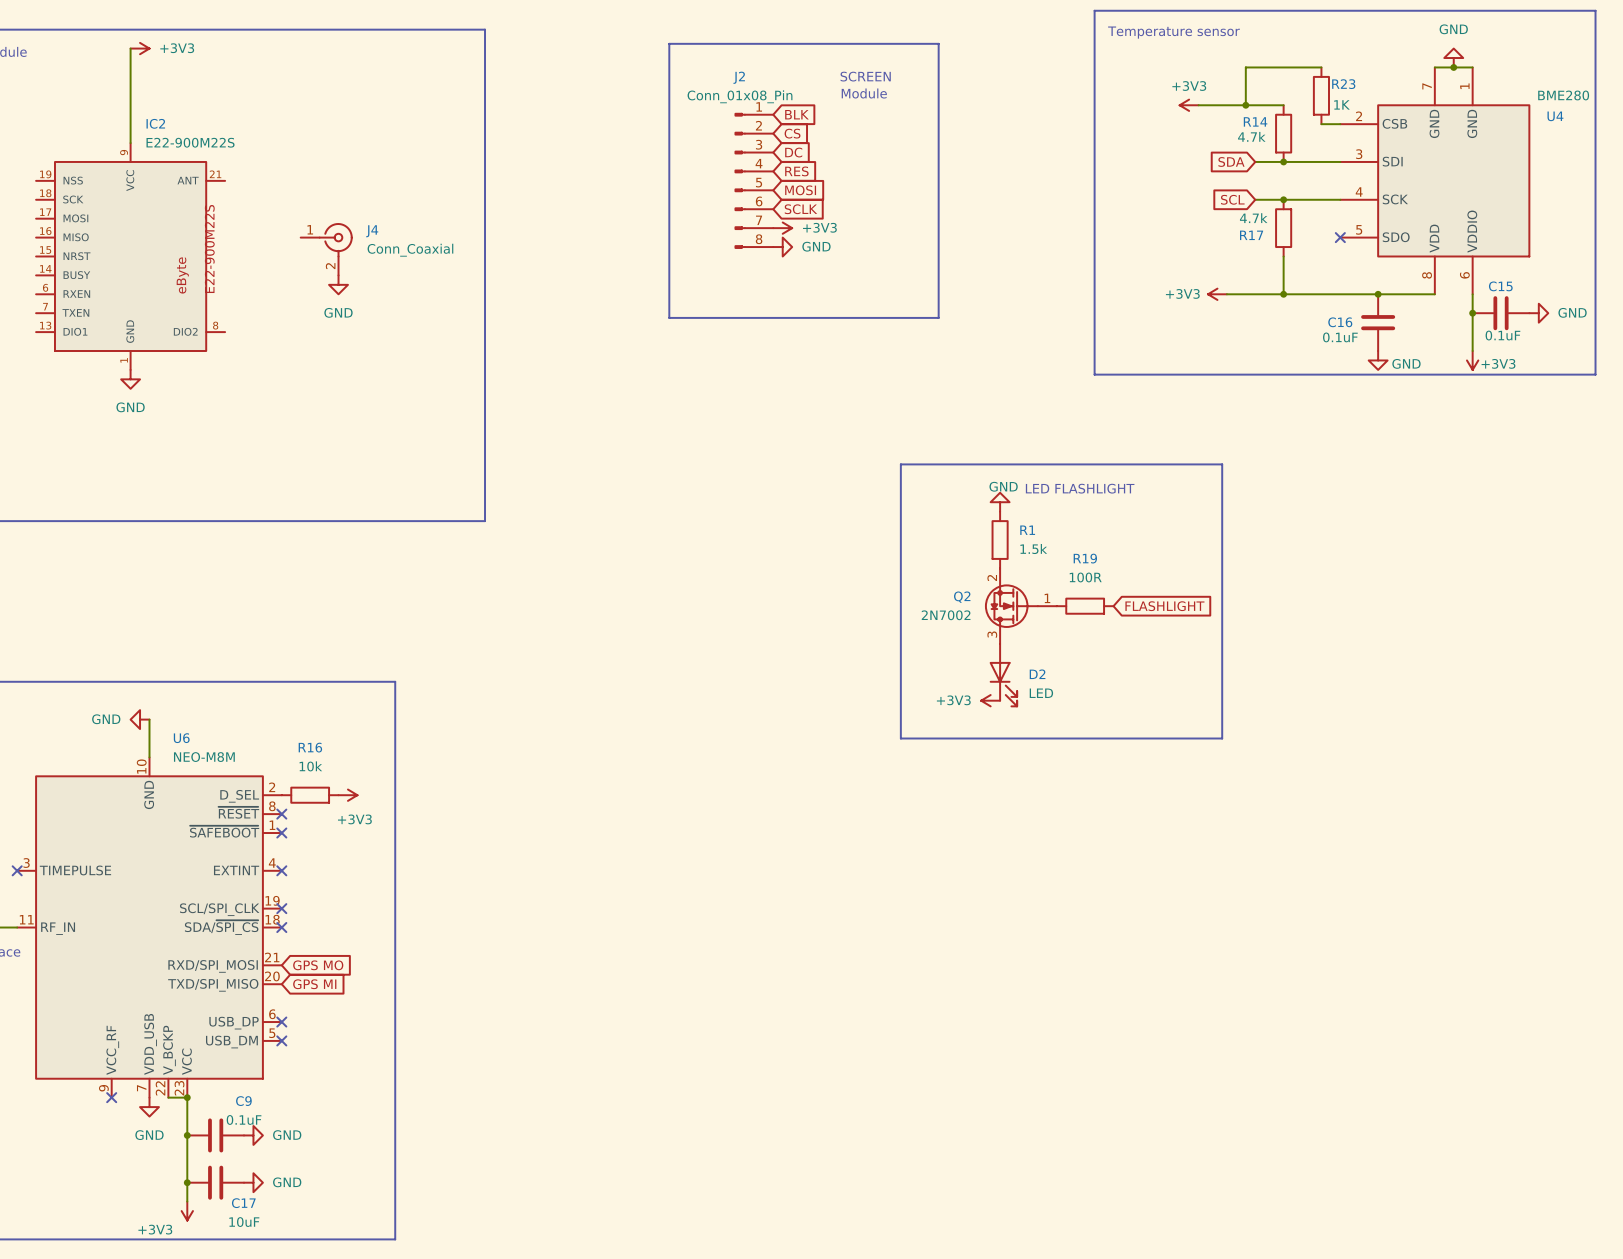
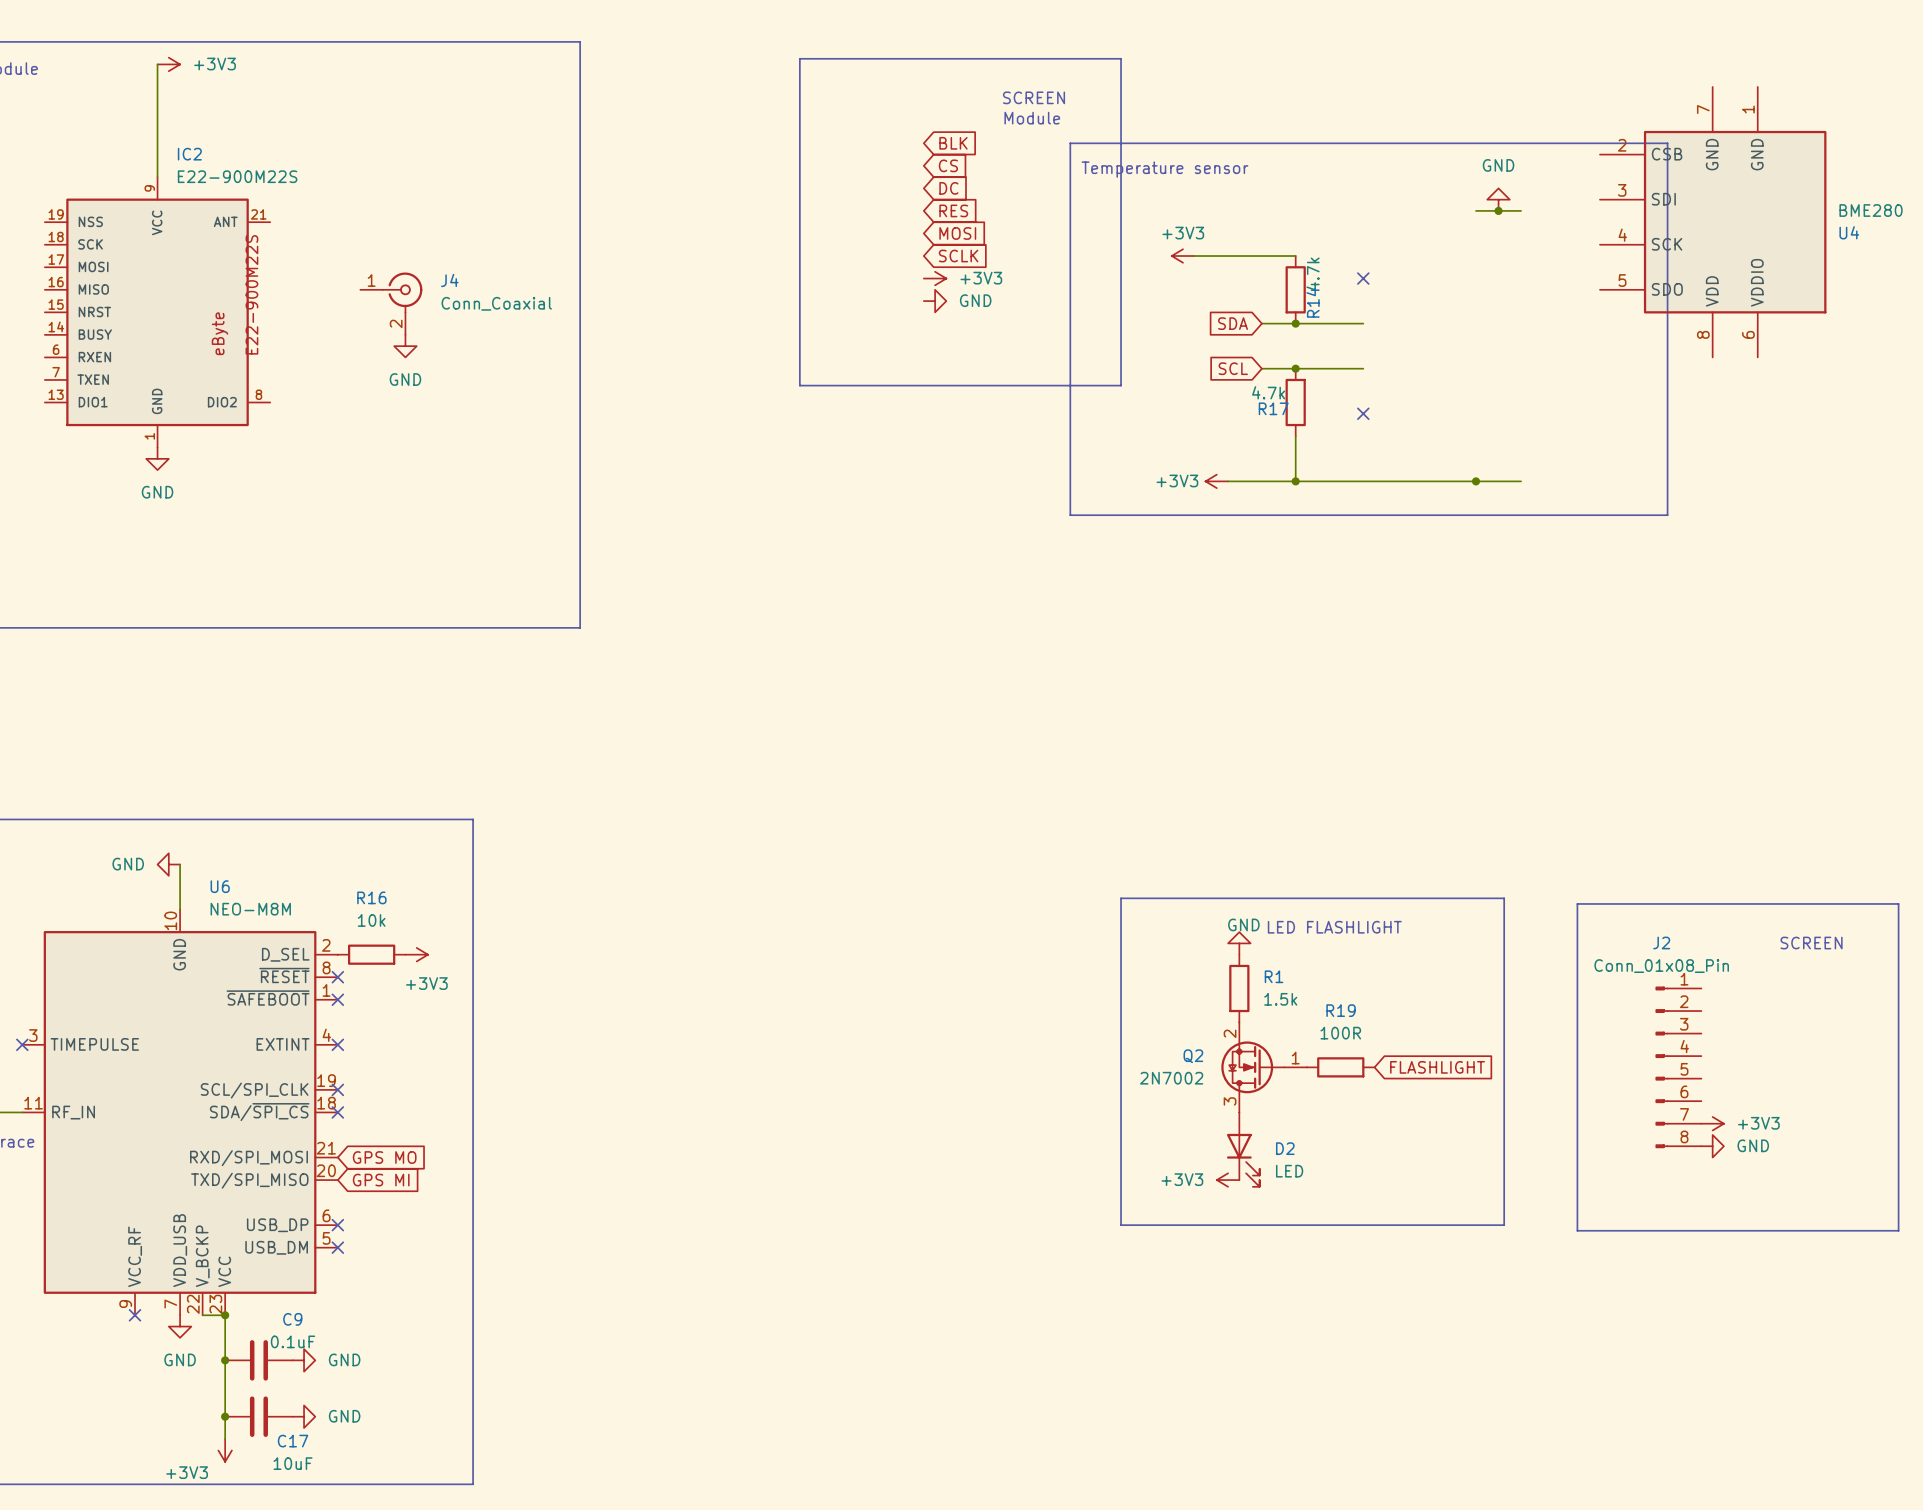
line: (1094, 10) (1595, 10) (1595, 374) (1094, 374) (1094, 10) -> none
text: Temperature sensor (1173, 32) -> none
power symbol: GND (1453, 58) -> none
wire: (1321, 67) (1245, 67) (1245, 105) -> none
wire: (1434, 67) (1472, 67) -> none
junction: (1453, 67) -> none
R23: 1K (1321, 95) -> none
U4 value position: BME280 (1563, 95) -> BME280 (1871, 210)
power symbol: +3V3 (1189, 105) -> none
wire: (1198, 105) (1283, 105) -> none
junction: (1245, 105) -> none
line: none -> (1070, 143) (1667, 143) (1667, 515) (1070, 515) (1070, 143)
U4 name position: U4 (1555, 116) -> U4 (1849, 232)
R14 name rotation: 0° (1255, 121) -> 90° counterclockwise (1313, 302)
R14 name position: R14 (1255, 121) -> R14 (1313, 302)
wire: (1321, 124) (1340, 124) -> none
R14 position: (1283, 133) -> (1295, 289)
text: none -> Temperature sensor (1164, 169)
R14 value rotation: 0° (1251, 136) -> 90° counterclockwise (1313, 274)
R14 value position: 4.7k (1251, 136) -> 4.7k (1313, 274)
global label: SDA (1231, 161) -> none
wire: (1255, 161) (1340, 161) -> none
power symbol: none -> GND (1498, 199)
junction: (1283, 161) -> none
wire: none -> (1476, 210) (1521, 210)
junction: none -> (1498, 210)
J2 position: (754, 180) -> (1678, 1067)
global label: SCL (1232, 199) -> none
wire: (1255, 199) (1340, 199) -> none
junction: (1283, 199) -> none
power symbol: none -> +3V3 (1183, 256)
wire: none -> (1194, 256) (1295, 256)
R17 value position: 4.7k (1253, 218) -> 4.7k (1268, 392)
no-connect mark: none -> (1363, 278)
R17 position: (1283, 228) -> (1295, 402)
R17 name position: R17 (1251, 235) -> R17 (1273, 408)
no-connect mark: (1340, 237) -> none
wire: (1283, 256) (1283, 294) -> none
global label: none -> SDA (1233, 323)
wire: none -> (1261, 323) (1363, 323)
junction: none -> (1295, 323)
power symbol: +3V3 (1217, 294) -> none
wire: (1226, 294) (1434, 294) -> none
junction: (1283, 294) -> none
junction: (1378, 294) -> none
wire: (1472, 294) (1472, 351) -> none
global label: none -> SCL (1233, 368)
wire: none -> (1261, 368) (1363, 368)
junction: none -> (1295, 368)
junction: (1472, 313) -> none
C15: 0.1uF (1501, 313) -> none
power symbol: GND (1538, 313) -> none
C16: 0.1uF (1378, 322) -> none
no-connect mark: none -> (1363, 413)
wire: none -> (1295, 436) (1295, 481)
power symbol: GND (1378, 360) -> none
power symbol: +3V3 (1472, 360) -> none
power symbol: none -> +3V3 (1216, 481)
wire: none -> (1228, 481) (1521, 481)
junction: none -> (1295, 481)
junction: none -> (1476, 481)
line: (900, 464) (1222, 464) (1222, 738) (900, 738) (900, 464) -> none
text: LED FLASHLIGHT (1080, 488) -> none
power symbol: GND (1000, 502) -> none
R1 position: (1000, 540) -> (1239, 988)
Q2 position: (1020, 606) -> (1264, 1067)
R19 position: (1085, 606) -> (1340, 1067)
global label: FLASHLIGHT (1164, 606) -> none
D2 position: (1003, 675) -> (1243, 1149)
power symbol: +3V3 (990, 700) -> none
line: none -> (1121, 898) (1504, 898) (1504, 1225) (1121, 1225) (1121, 898)
line: none -> (1577, 903) (1898, 903) (1898, 1230) (1577, 1230) (1577, 903)
text: none -> LED FLASHLIGHT (1334, 927)
power symbol: none -> GND (1239, 943)
text: none -> SCREEN (1811, 943)
global label: none -> FLASHLIGHT (1437, 1067)
power symbol: none -> +3V3 (1712, 1123)
power symbol: none -> GND (1712, 1146)
power symbol: none -> +3V3 (1228, 1180)

